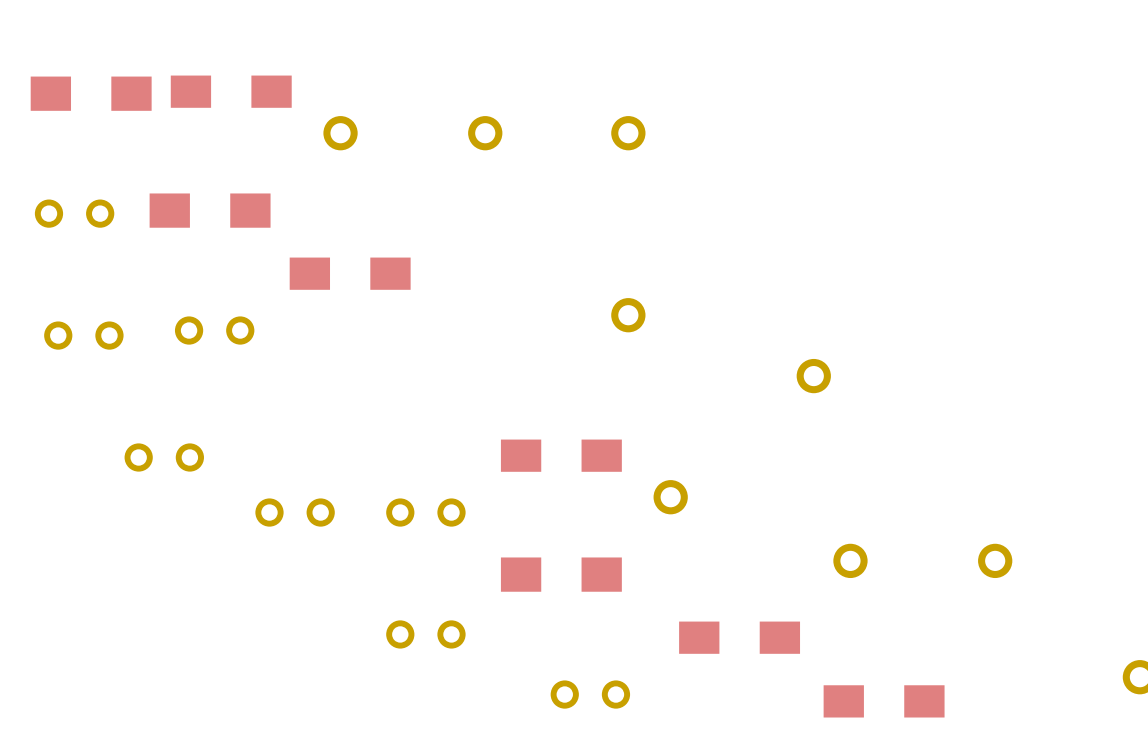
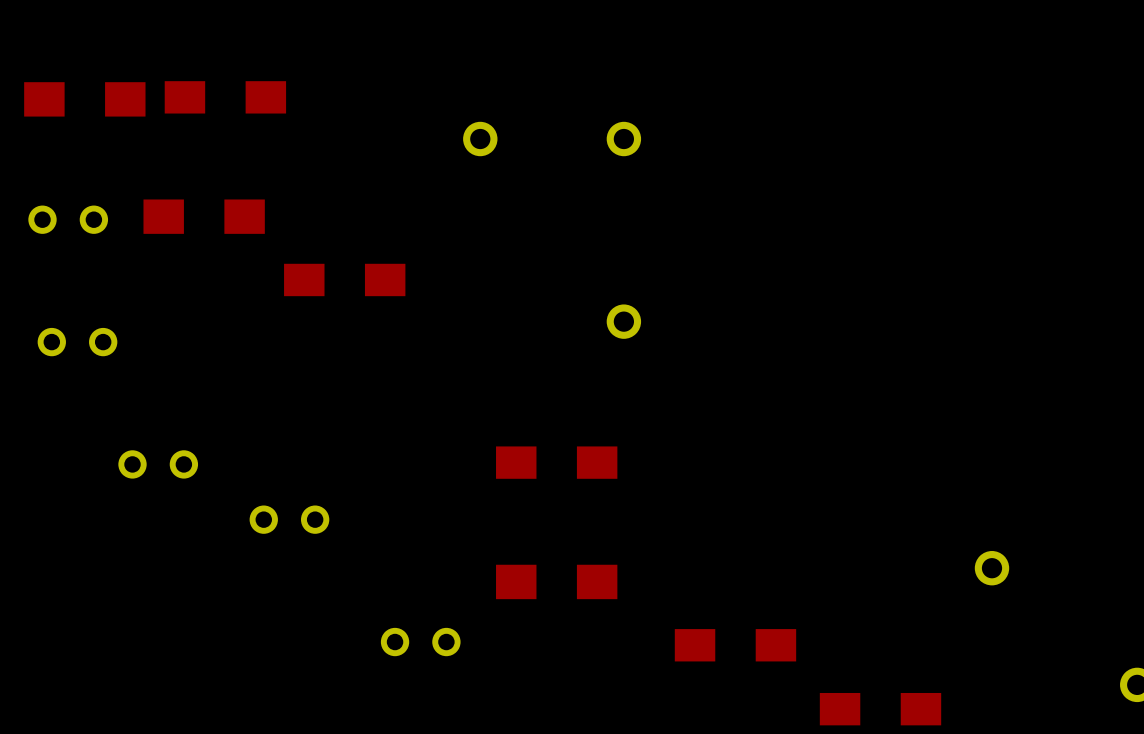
part: (340, 133) -> none
part: (214, 330) -> none
part: (813, 376) -> none
part: (670, 497) -> none
part: (425, 512) -> none
part: (850, 560) -> none
part: (590, 694) -> none

